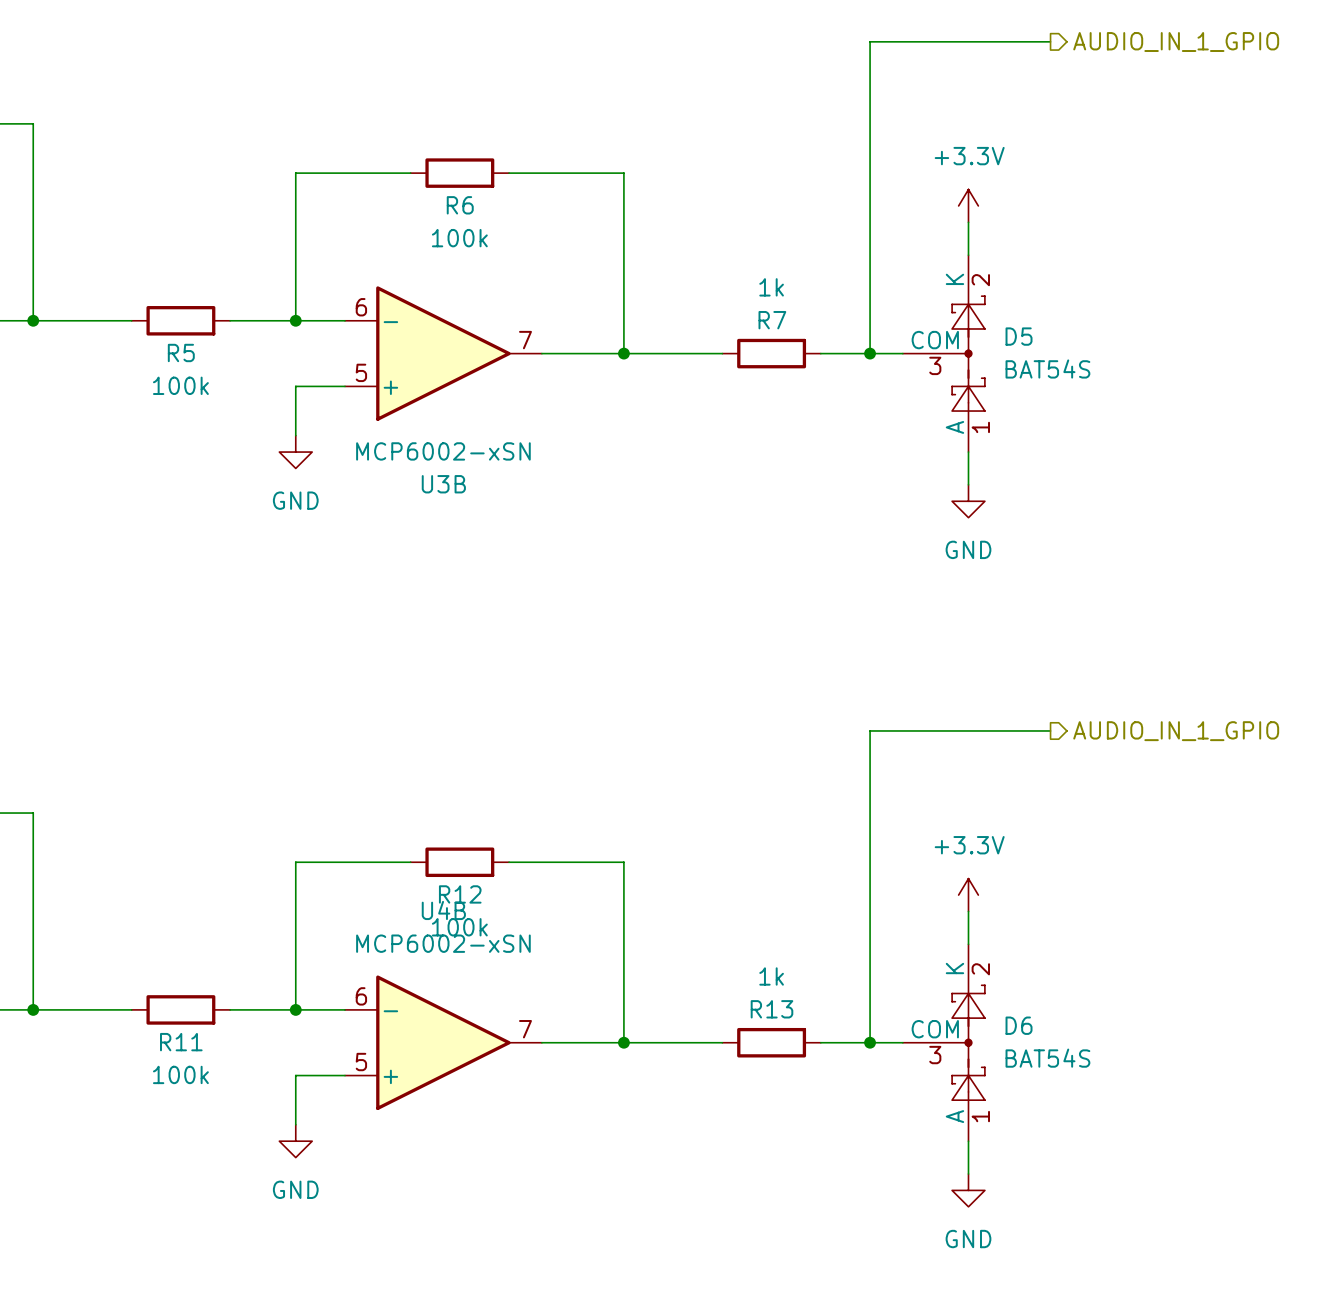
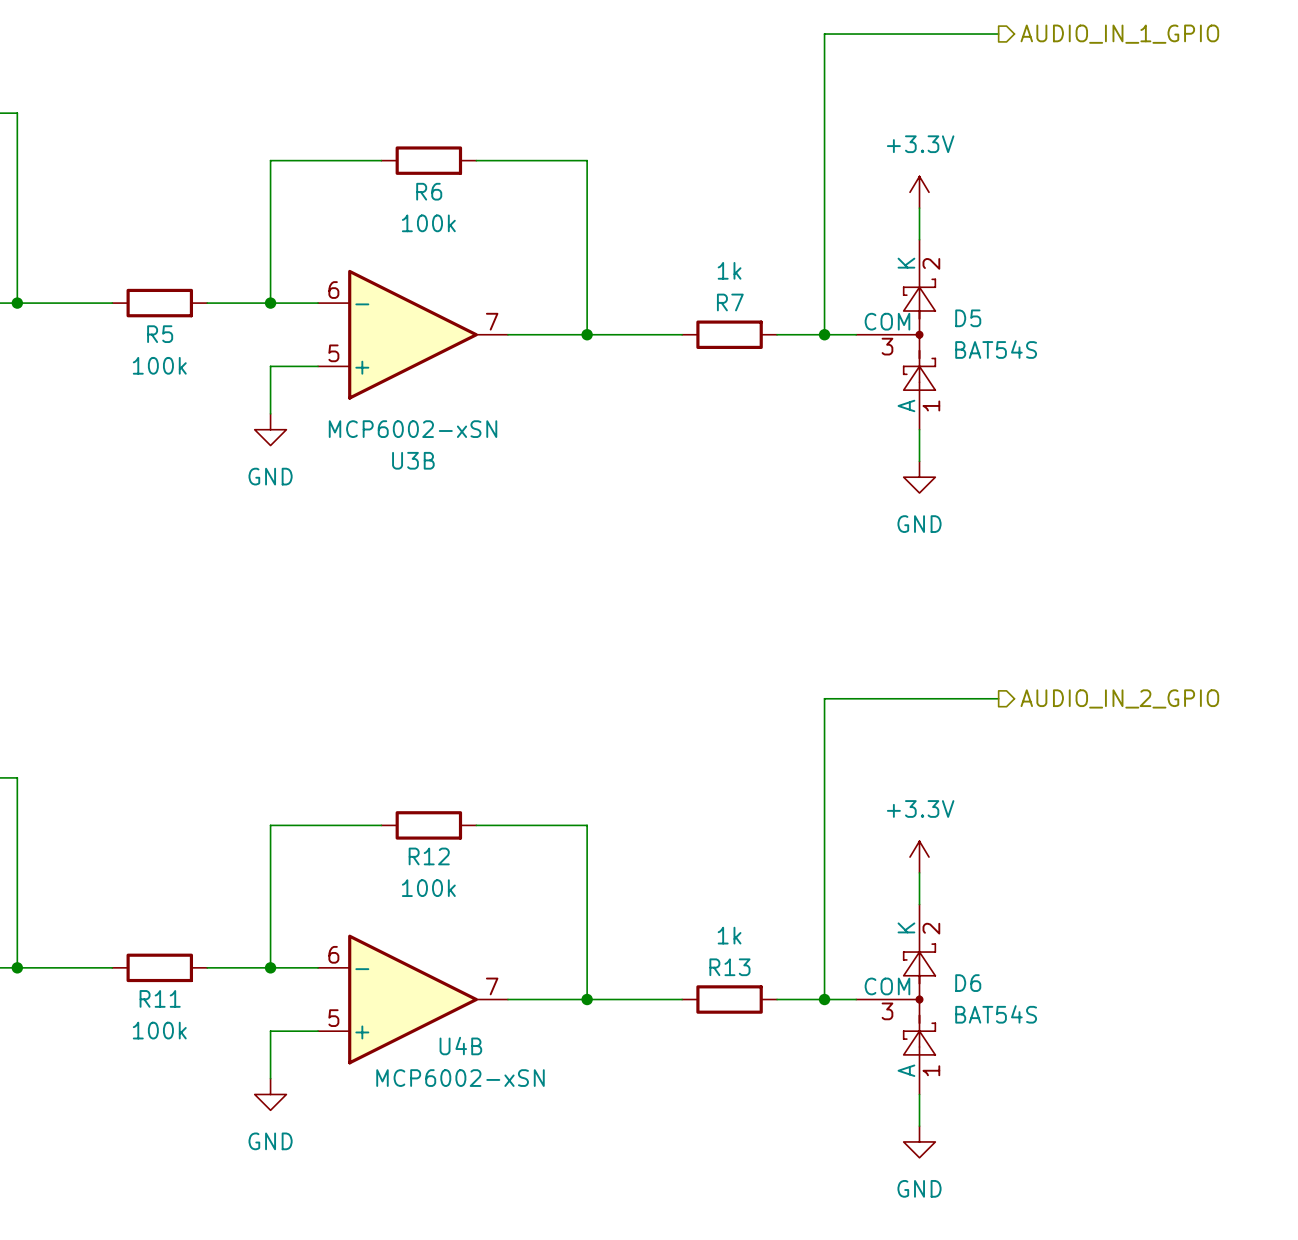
hierarchical label: AUDIO_IN_1_GPIO (1176, 731) -> AUDIO_IN_2_GPIO (1119, 698)
U4B name position: U4B (443, 910) -> U4B (460, 1046)
U4B value position: MCP6002-xSN (443, 943) -> MCP6002-xSN (460, 1078)

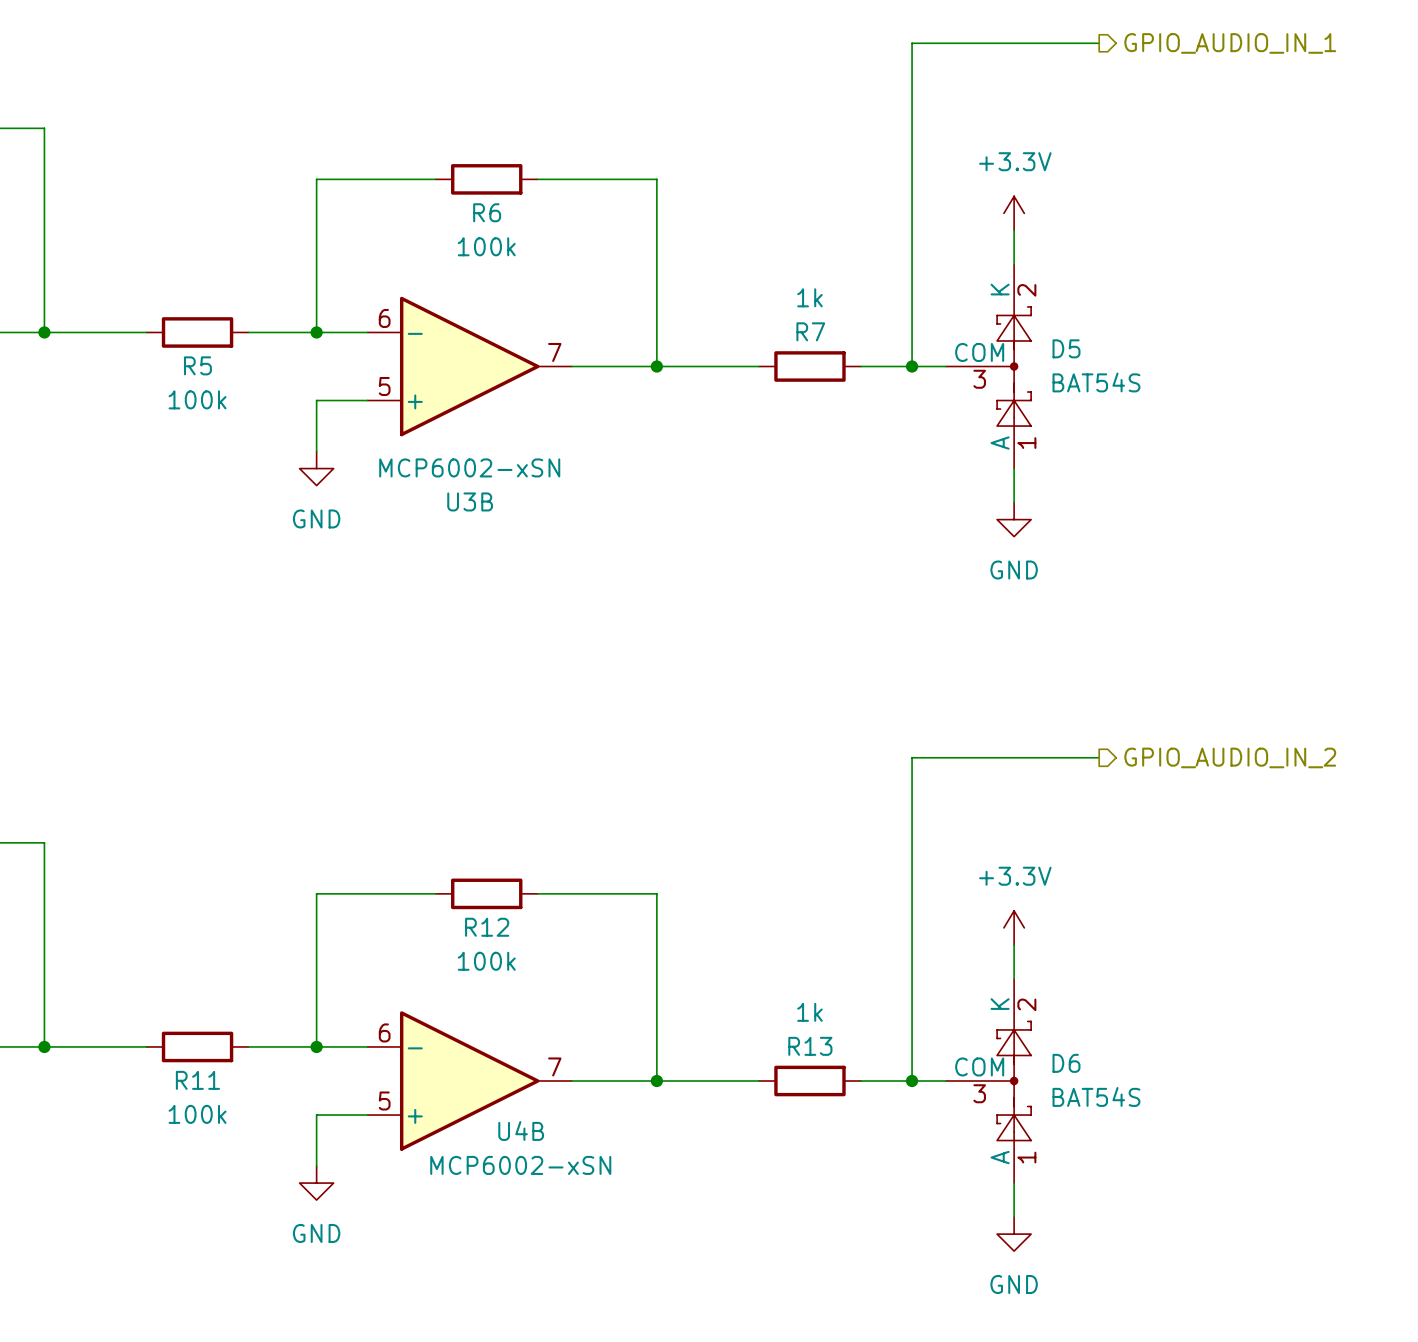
hierarchical label: AUDIO_IN_1_GPIO (1119, 34) -> GPIO_AUDIO_IN_1 (1230, 43)
hierarchical label: AUDIO_IN_2_GPIO (1119, 698) -> GPIO_AUDIO_IN_2 (1230, 757)

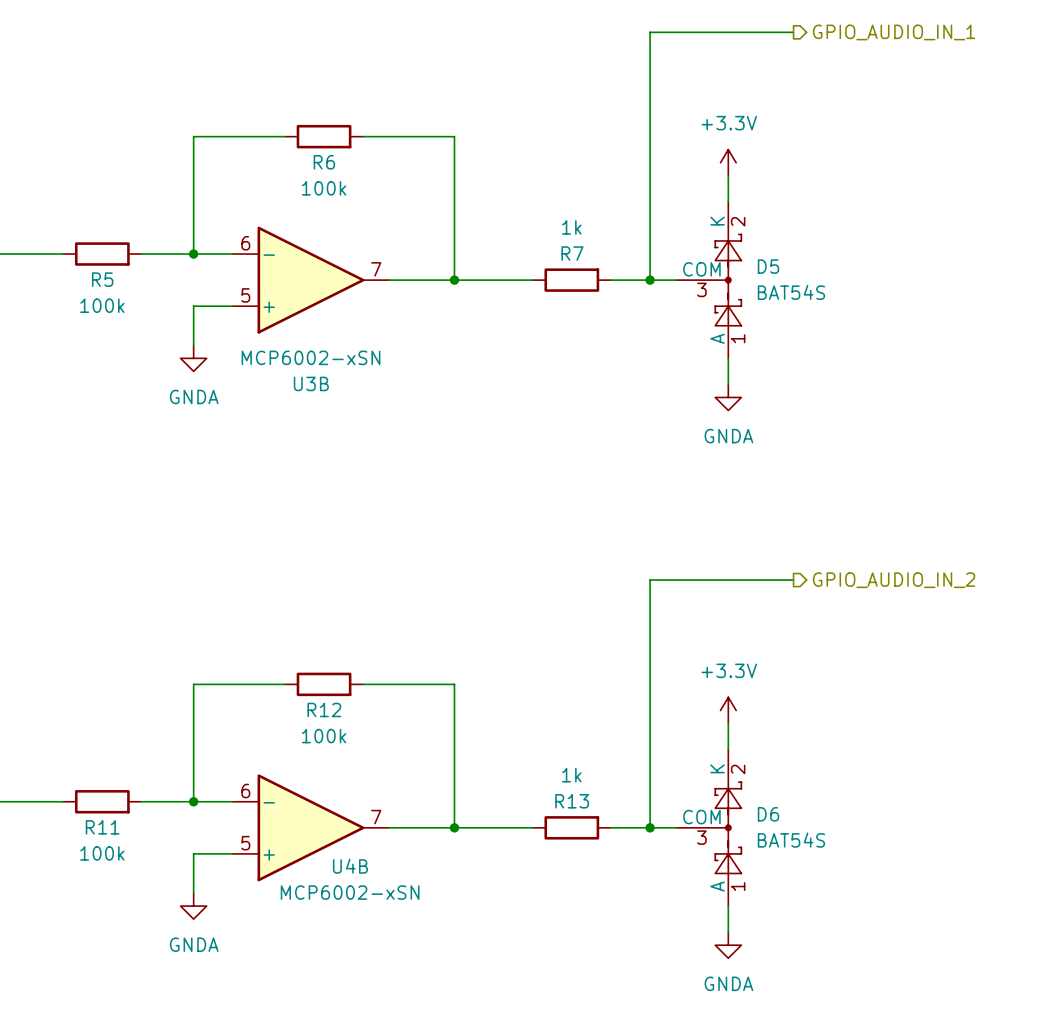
power symbol: GND (316, 468) -> GNDA (193, 358)
power symbol: GND (1014, 519) -> GNDA (728, 397)
power symbol: GND (316, 1183) -> GNDA (193, 906)
power symbol: GND (1014, 1234) -> GNDA (728, 945)

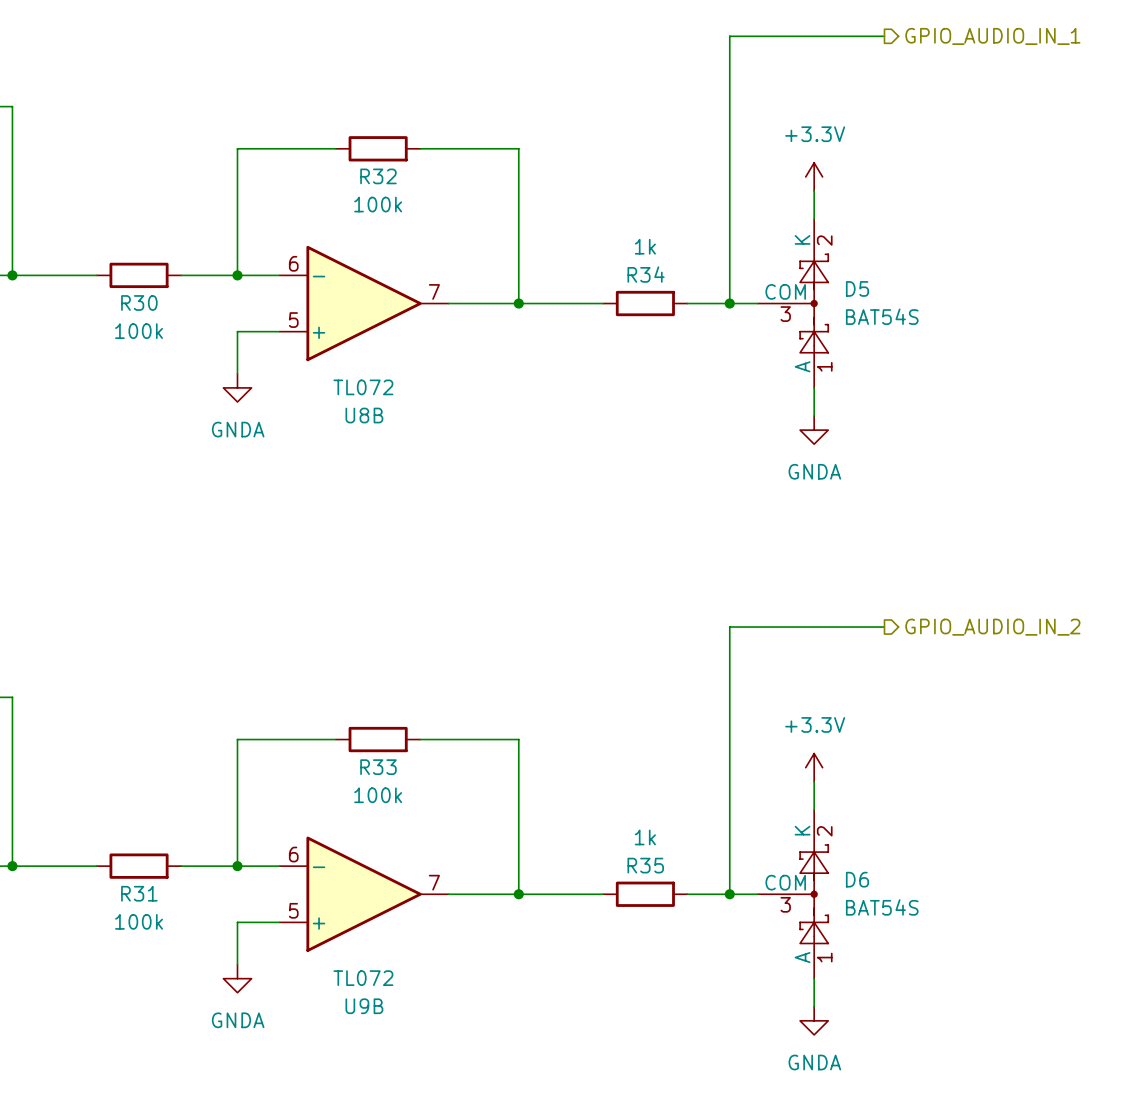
R6 name: R6 (324, 162) -> R32 (378, 176)
R7 name: R7 (572, 253) -> R34 (646, 274)
R5 name: R5 (102, 279) -> R30 (139, 303)
U3B value: MCP6002-xSN (311, 357) -> TL072 (363, 387)
U3B name: U3B (311, 383) -> U8B (364, 415)
R12 name: R12 (324, 709) -> R33 (378, 767)
R13 name: R13 (572, 801) -> R35 (645, 865)
R11 name: R11 (102, 827) -> R31 (139, 893)
U4B name: U4B (350, 866) -> U9B (364, 1006)
U4B value: MCP6002-xSN (350, 892) -> TL072 (363, 978)

